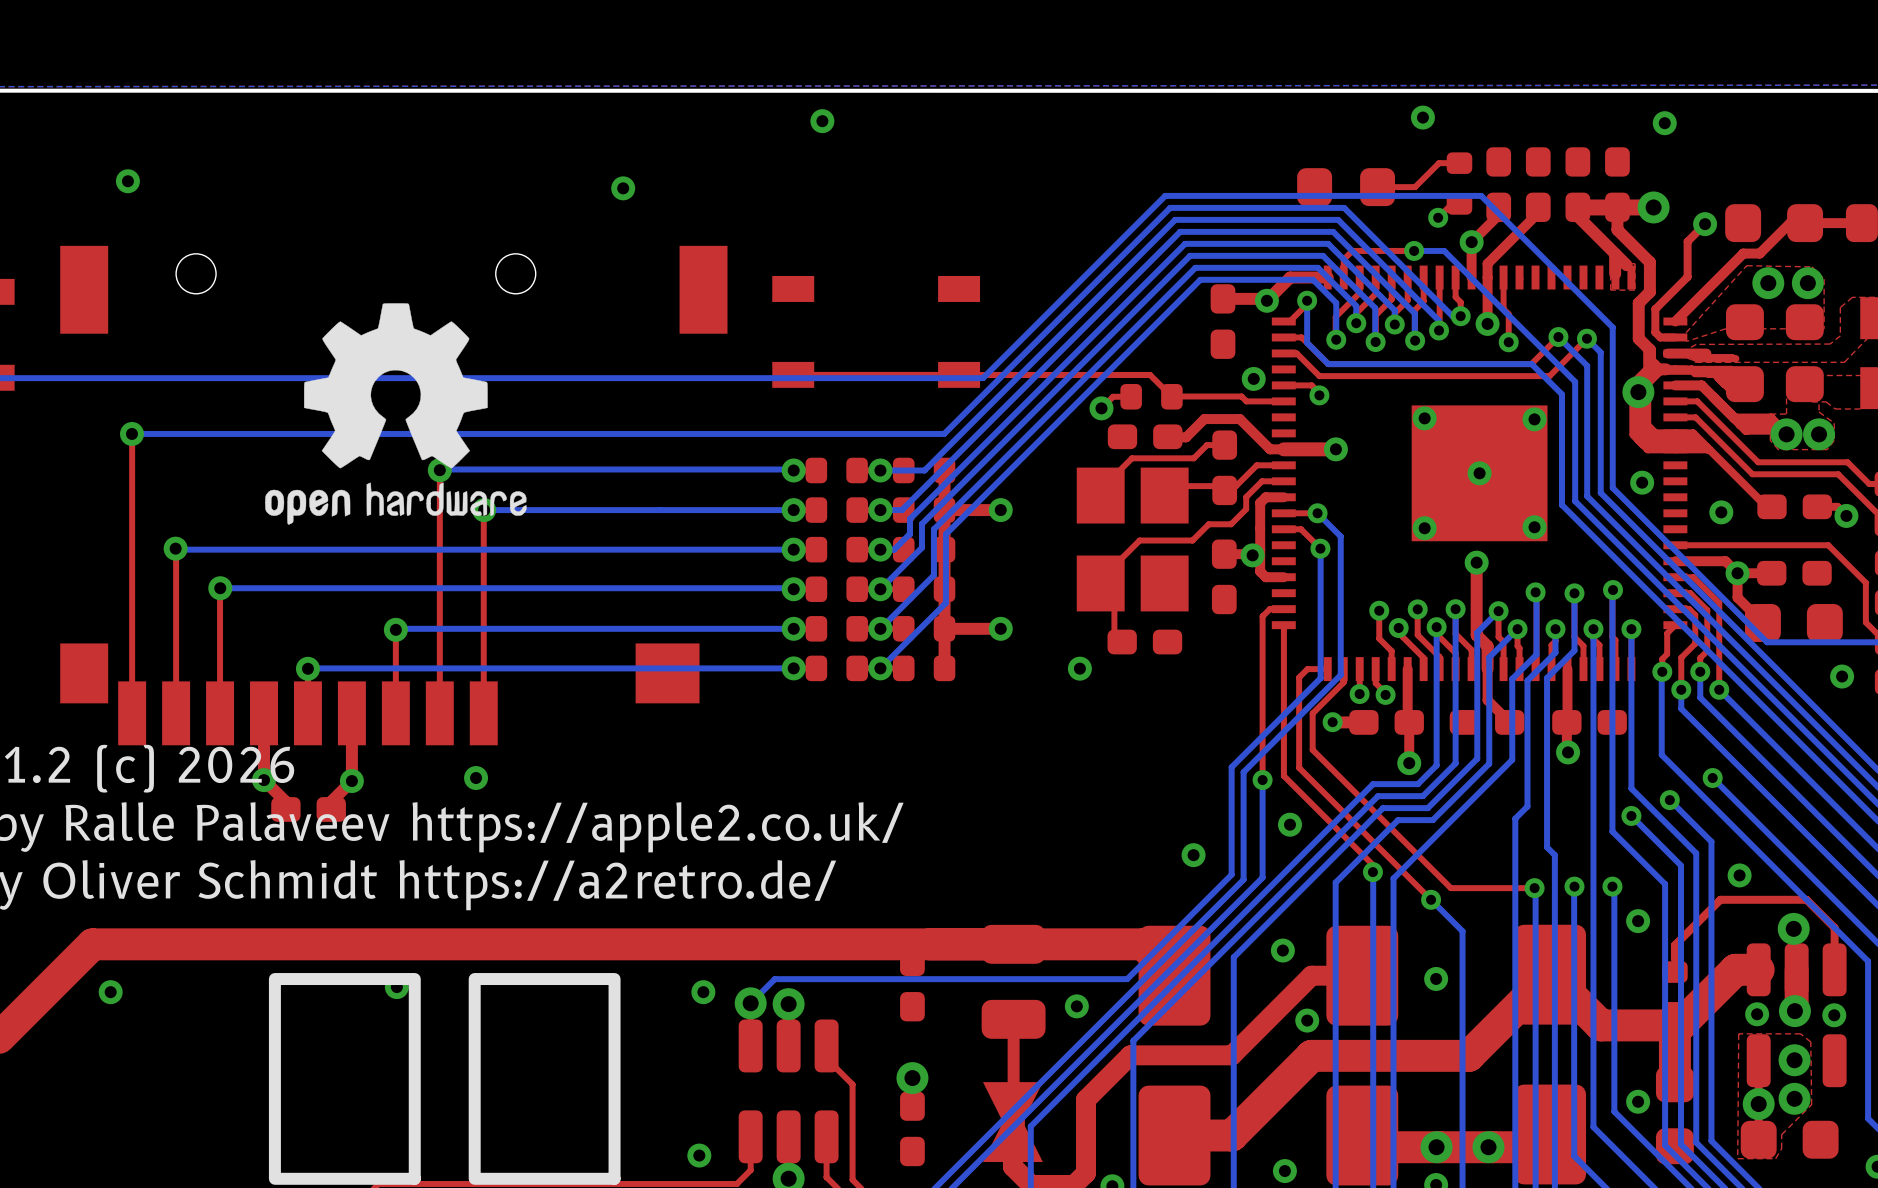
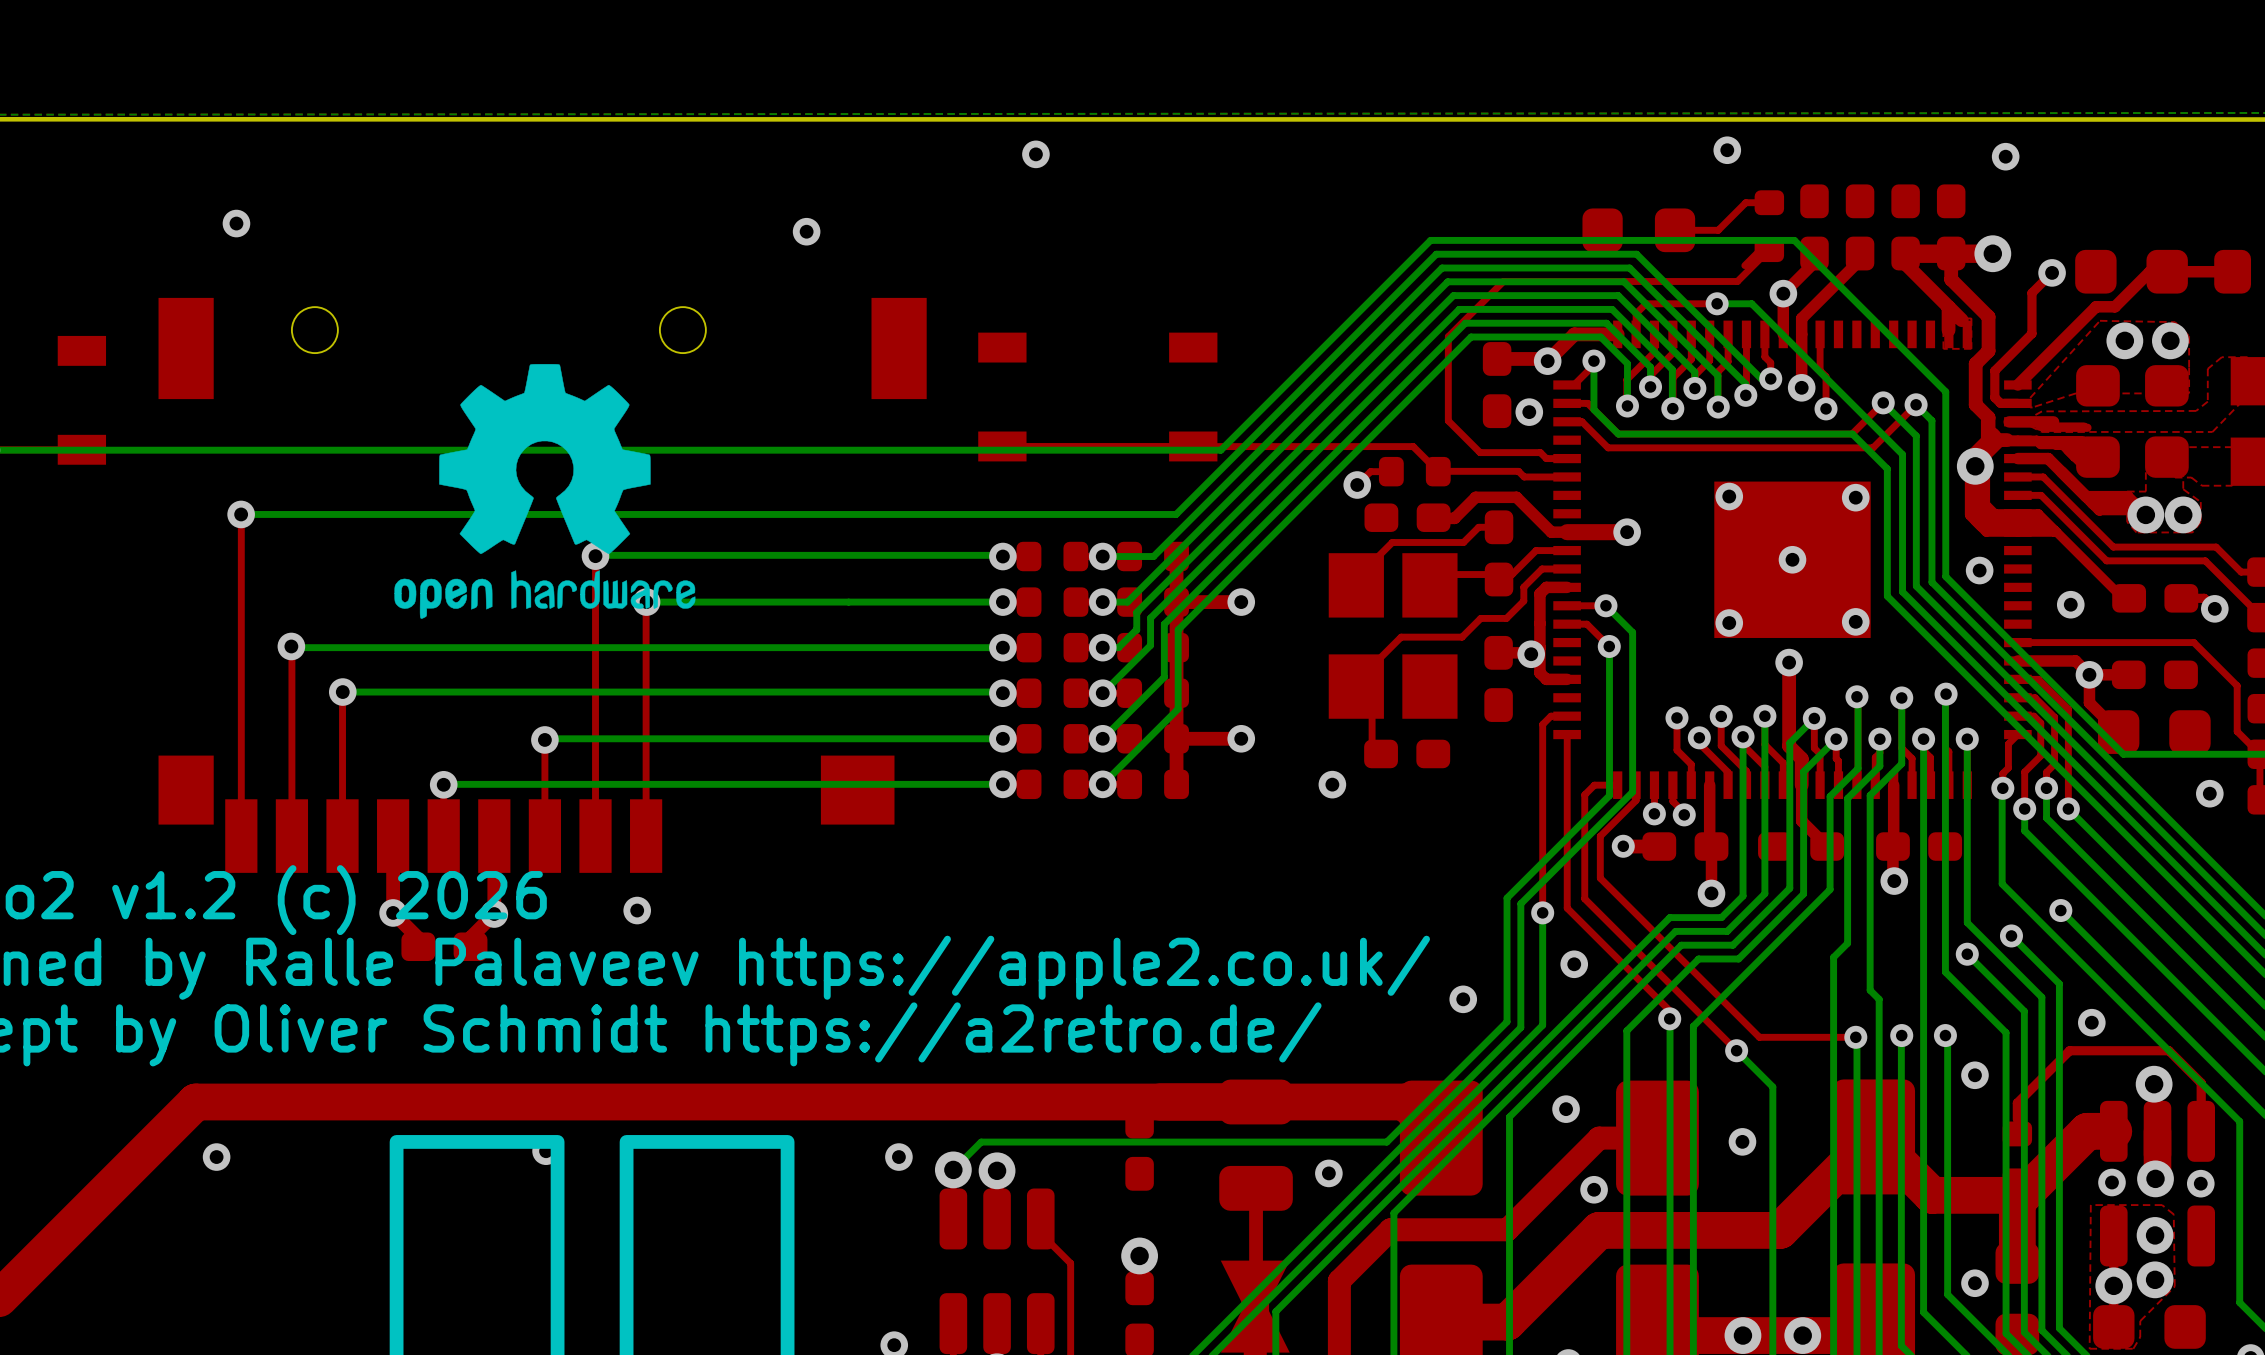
via: (1438, 217) -> none
via position: (1253, 378) -> (1529, 412)
top track: (1283, 385) (1311, 385) (1319, 395) -> (1567, 458) (1546, 458) (1540, 452) (1480, 452) (1448, 420) (1448, 336) (1503, 281) (1737, 281) (1764, 254)
via: (1319, 395) -> none

